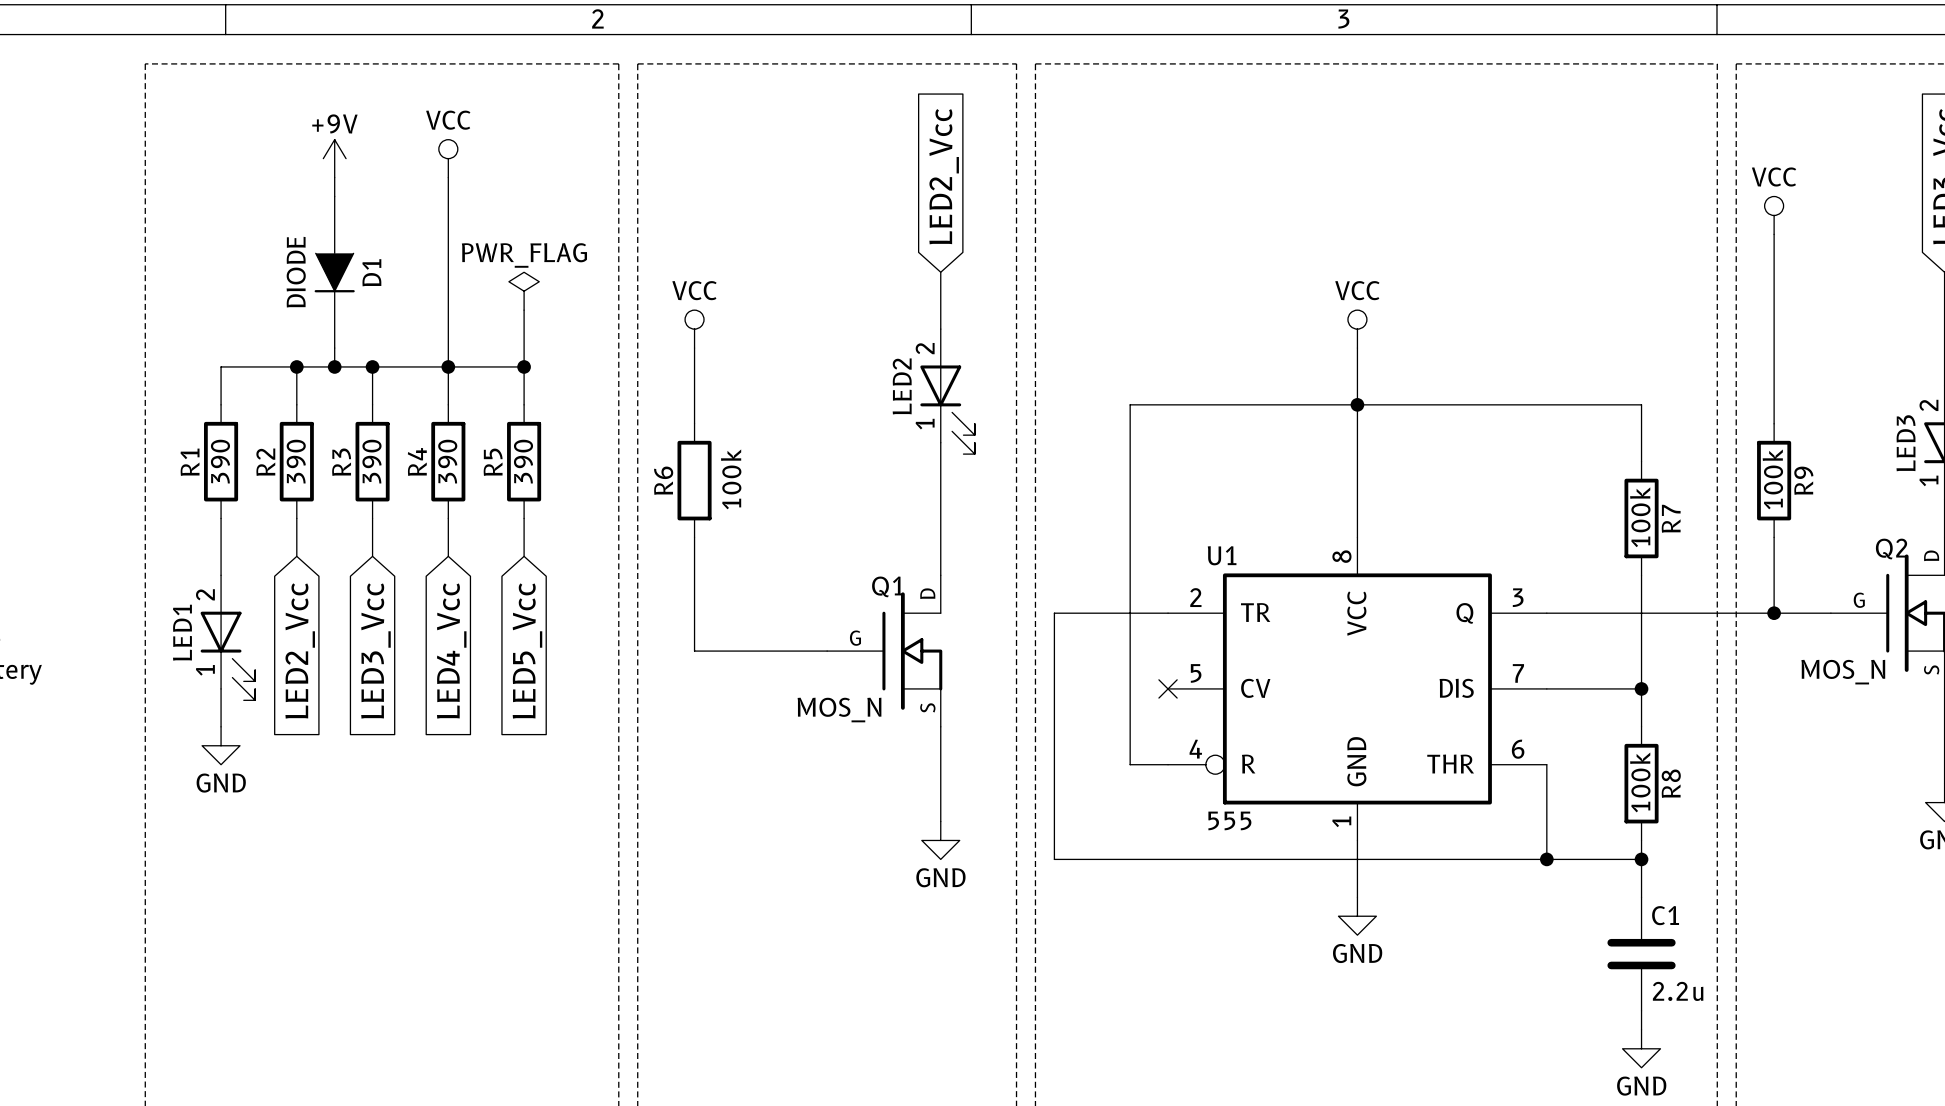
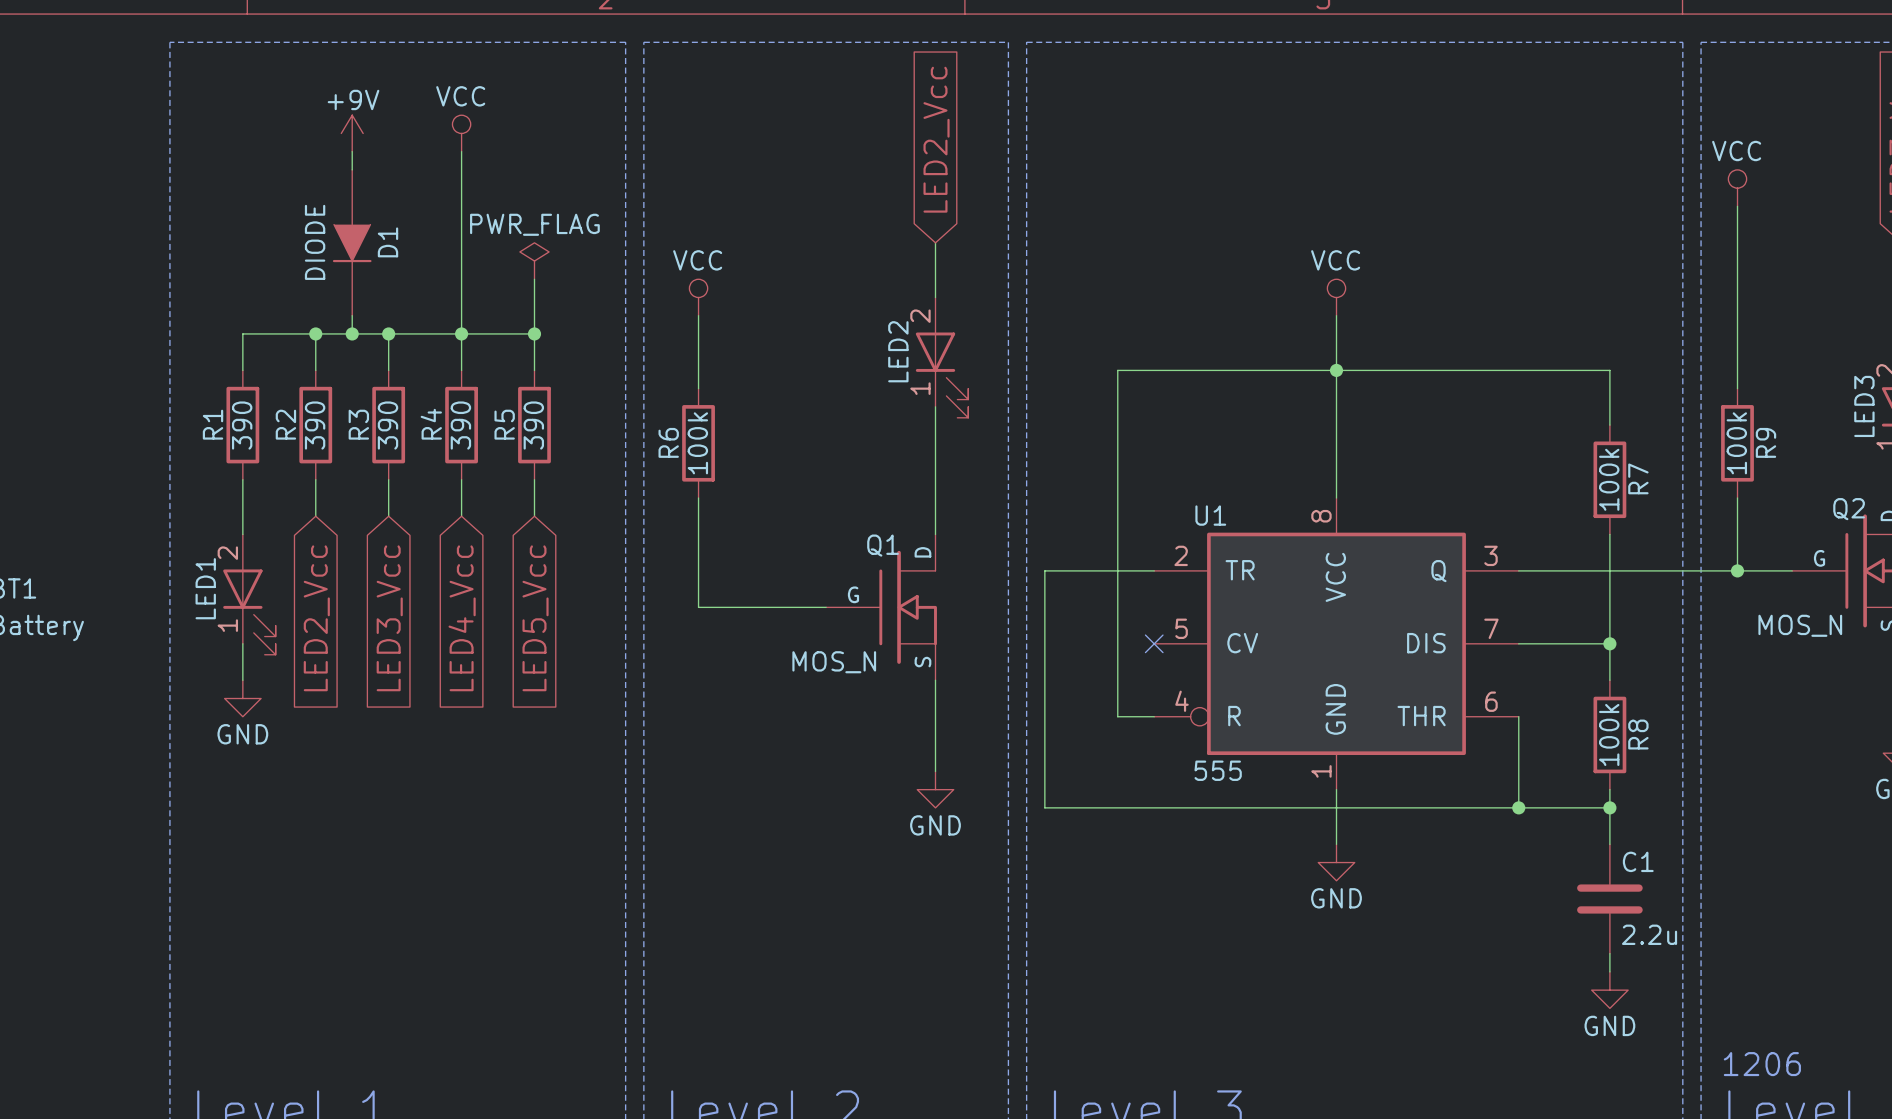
R6 value position: 100k (731, 479) -> 100k (697, 443)

